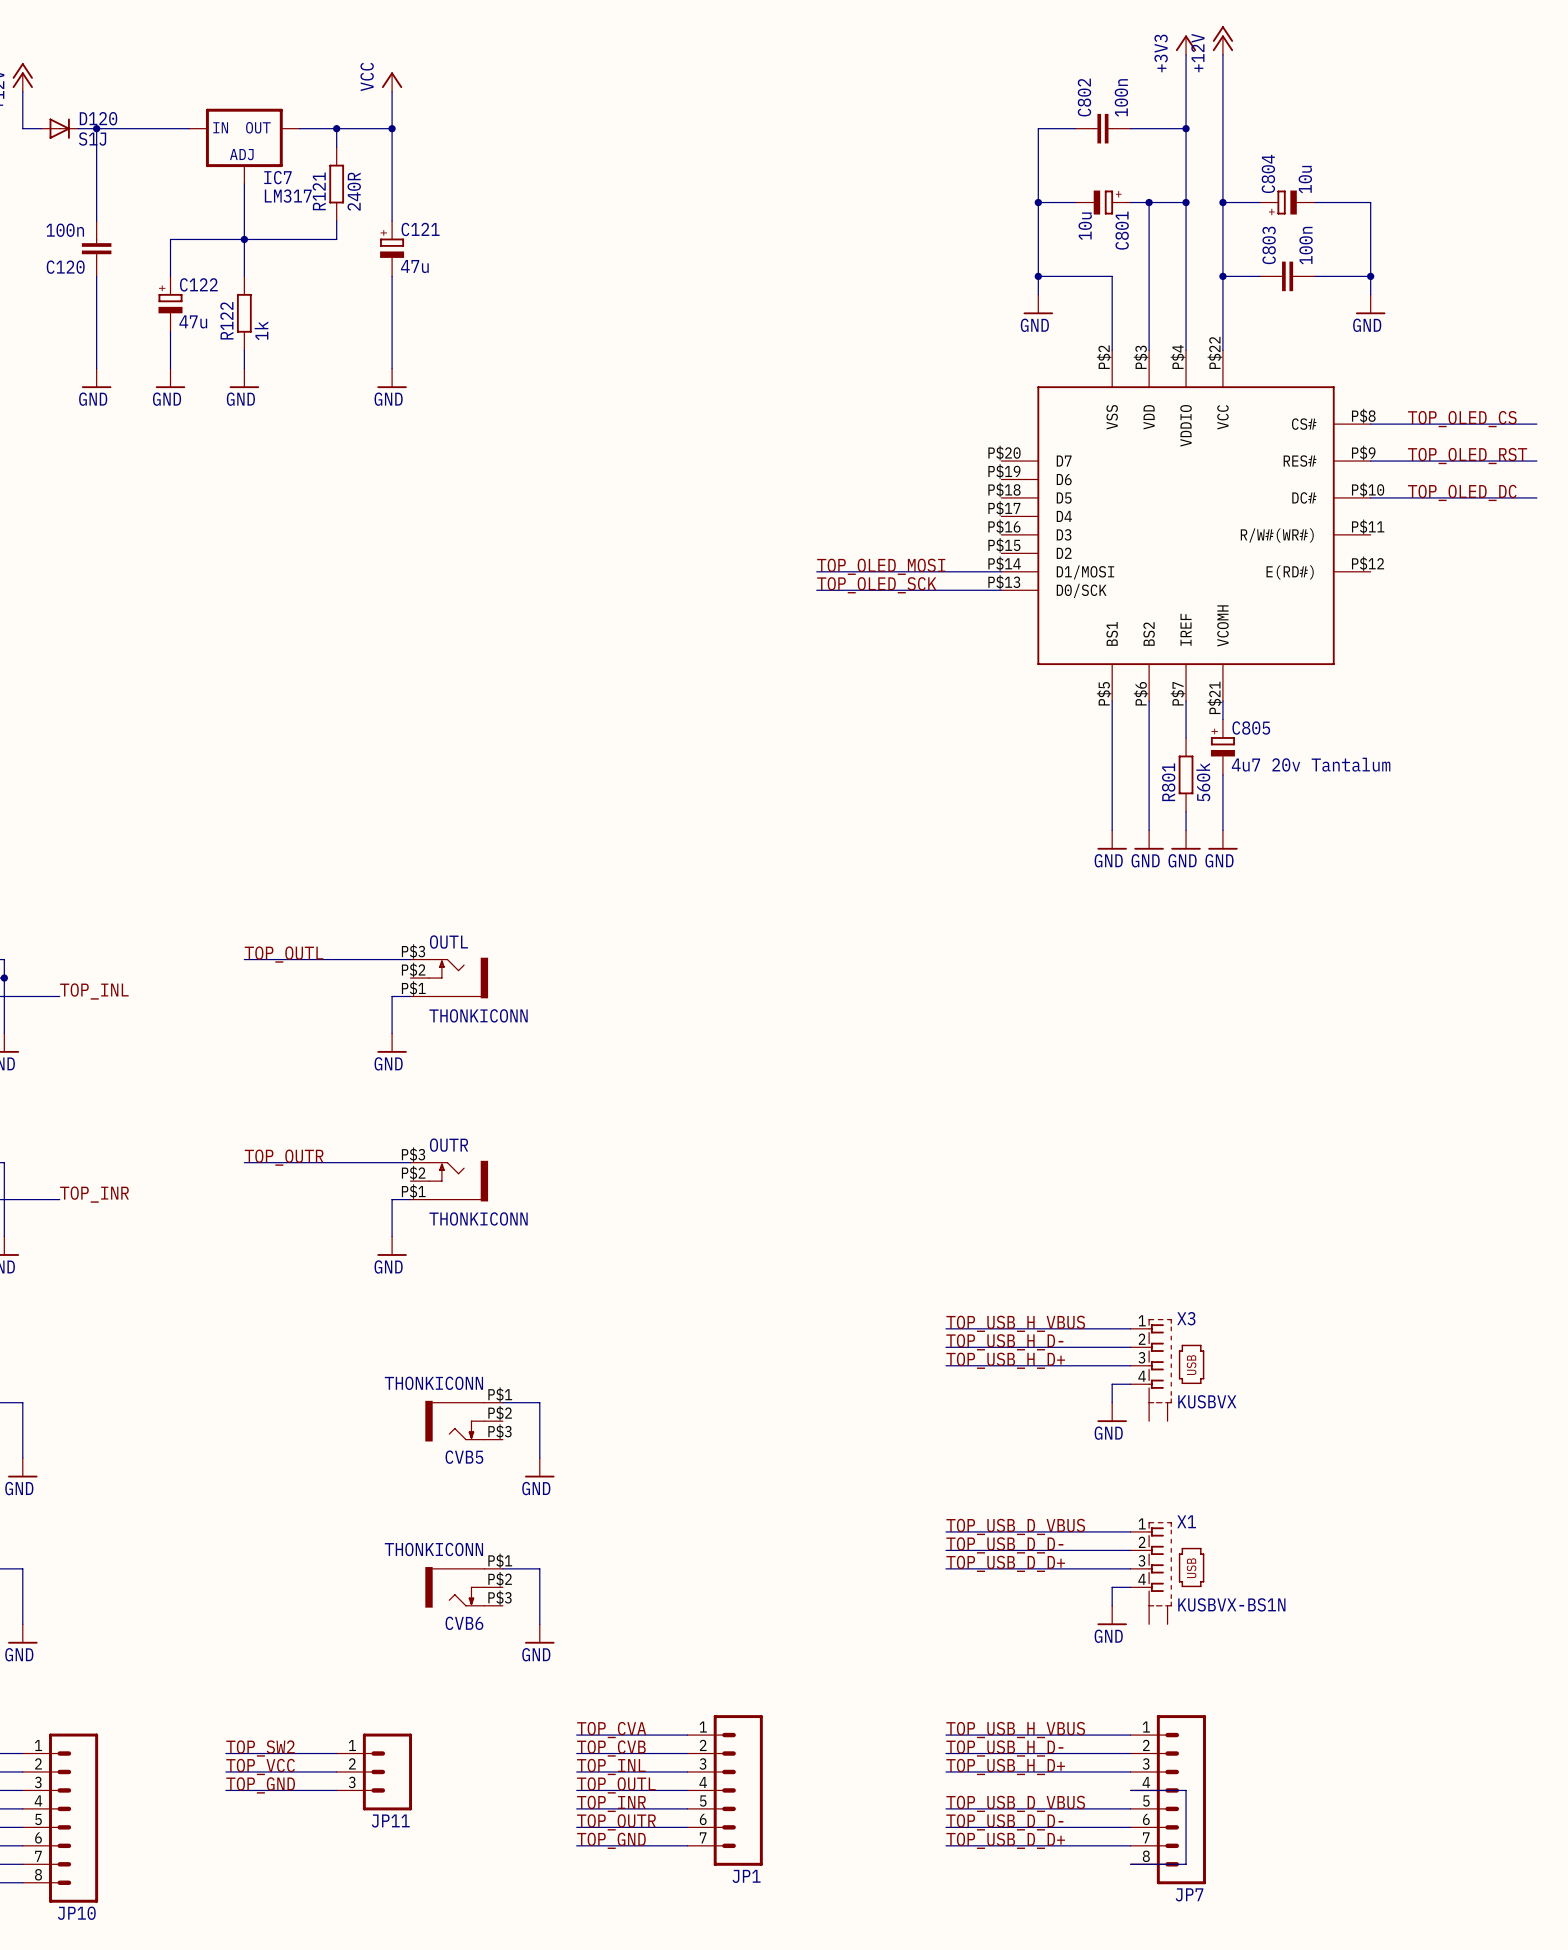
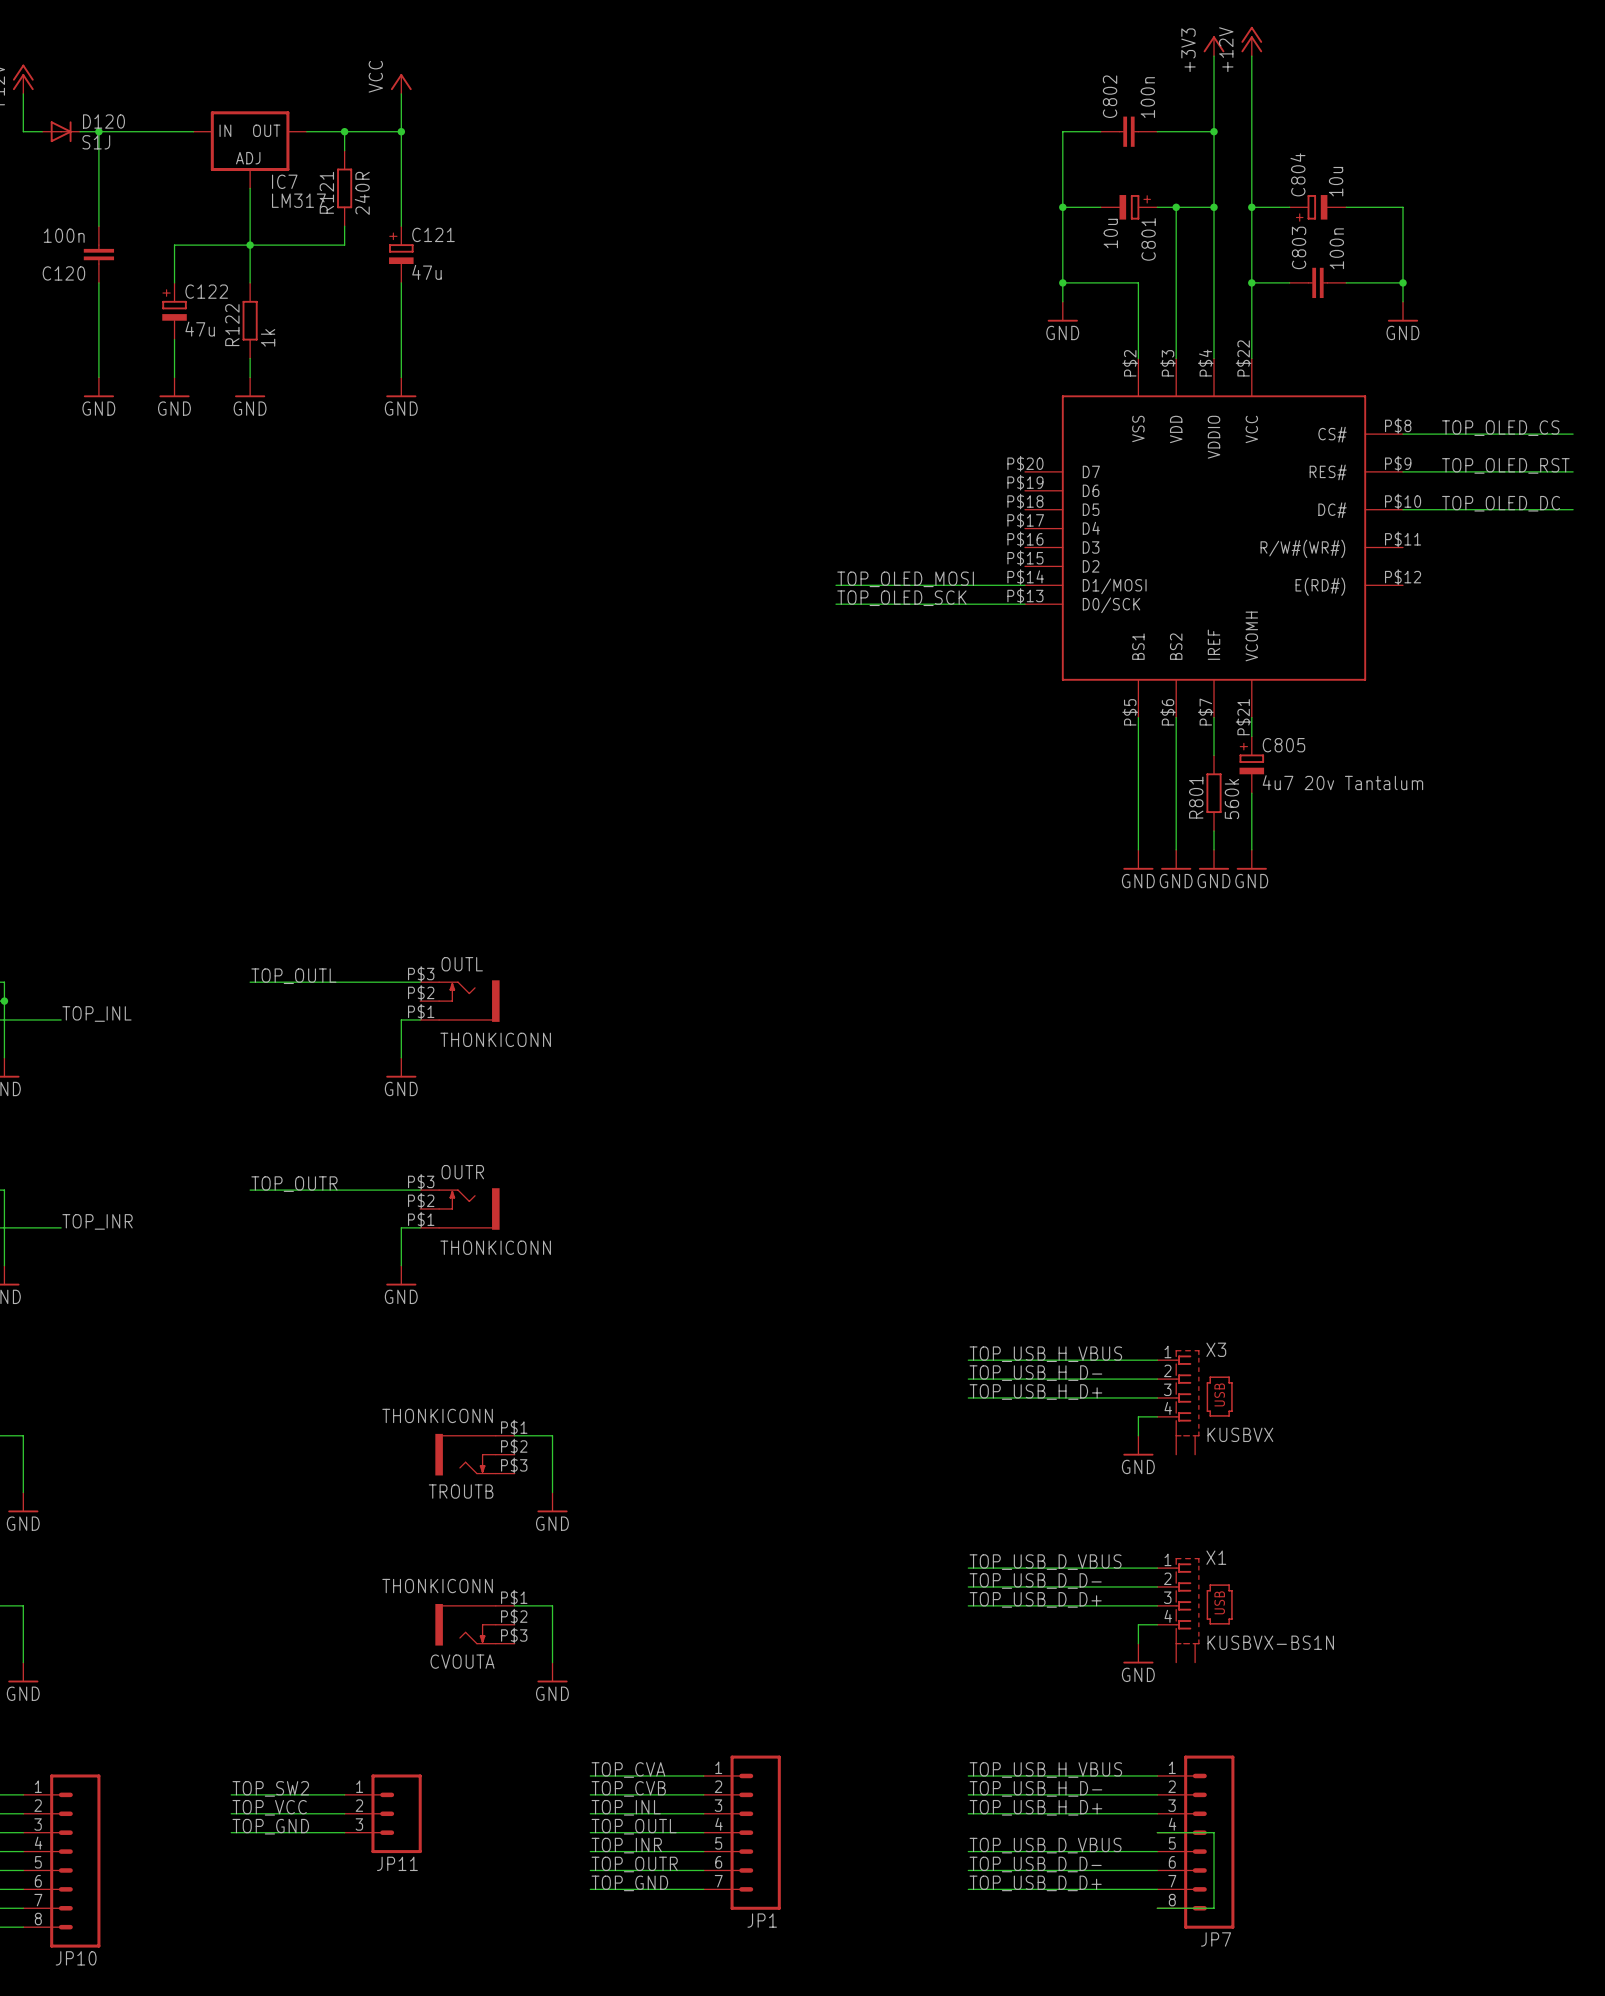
CVB5 name: CVB5 (464, 1457) -> TROUTB (461, 1491)
CVB6 name: CVB6 (464, 1623) -> CVOUTA (462, 1661)

